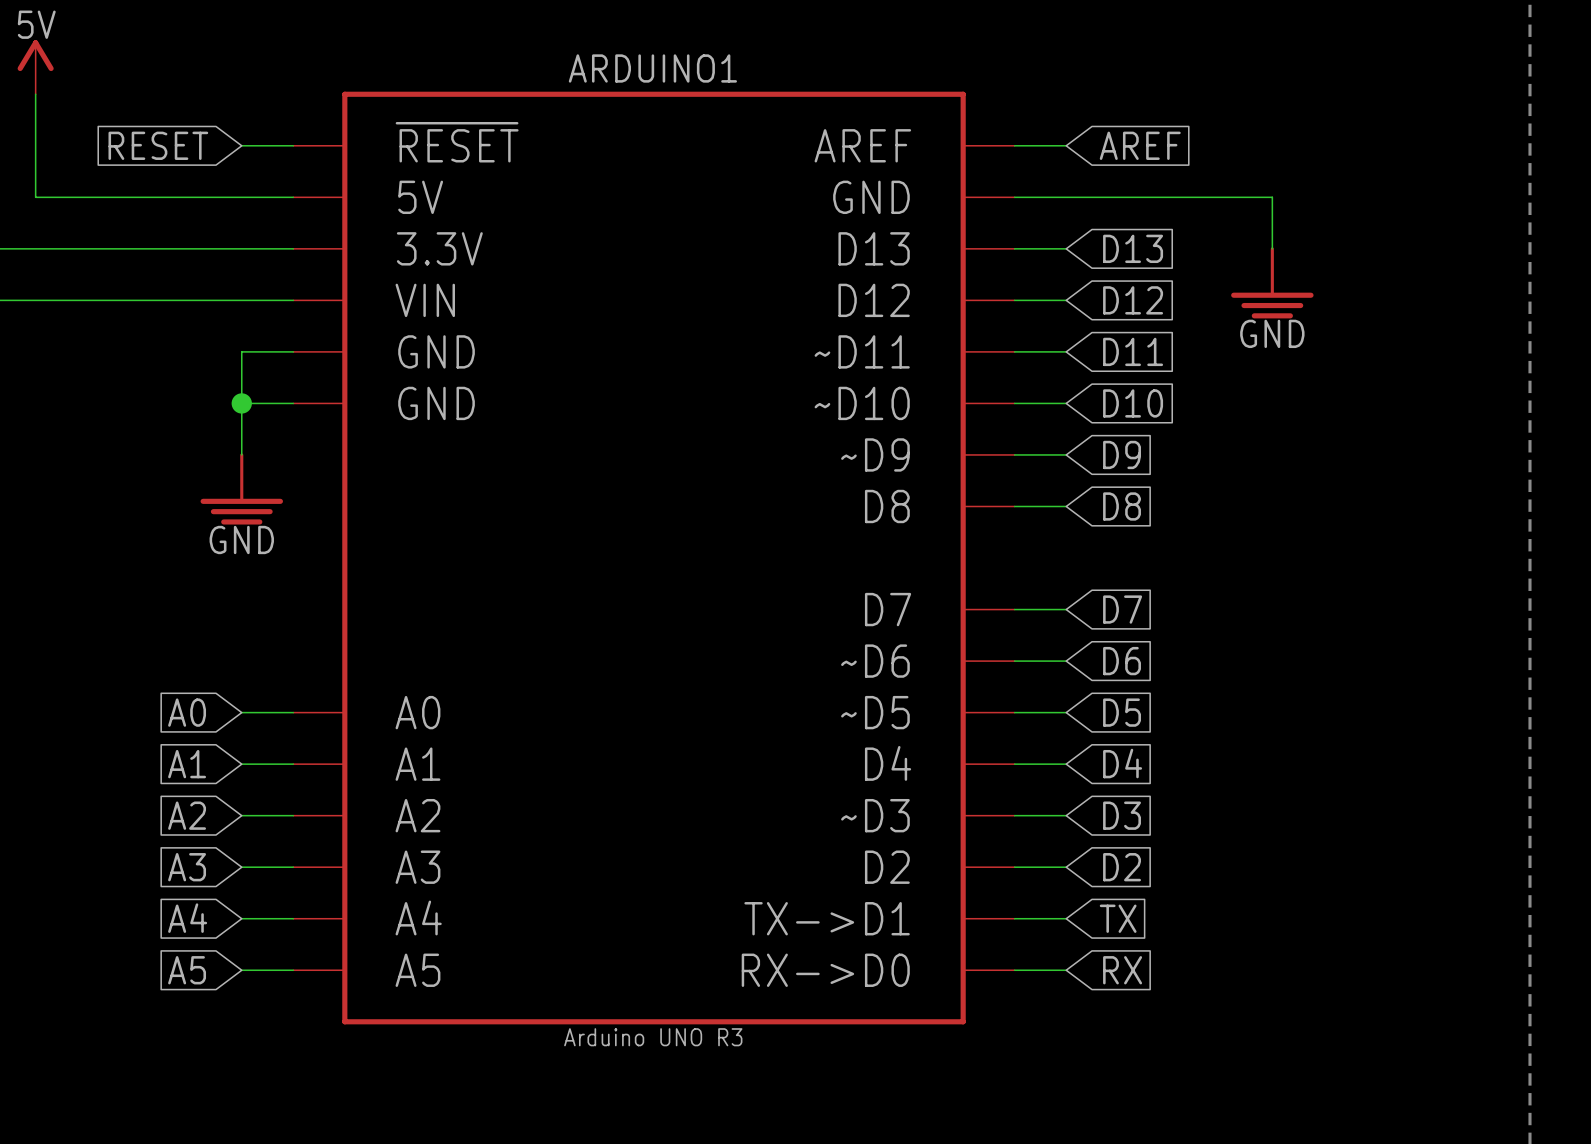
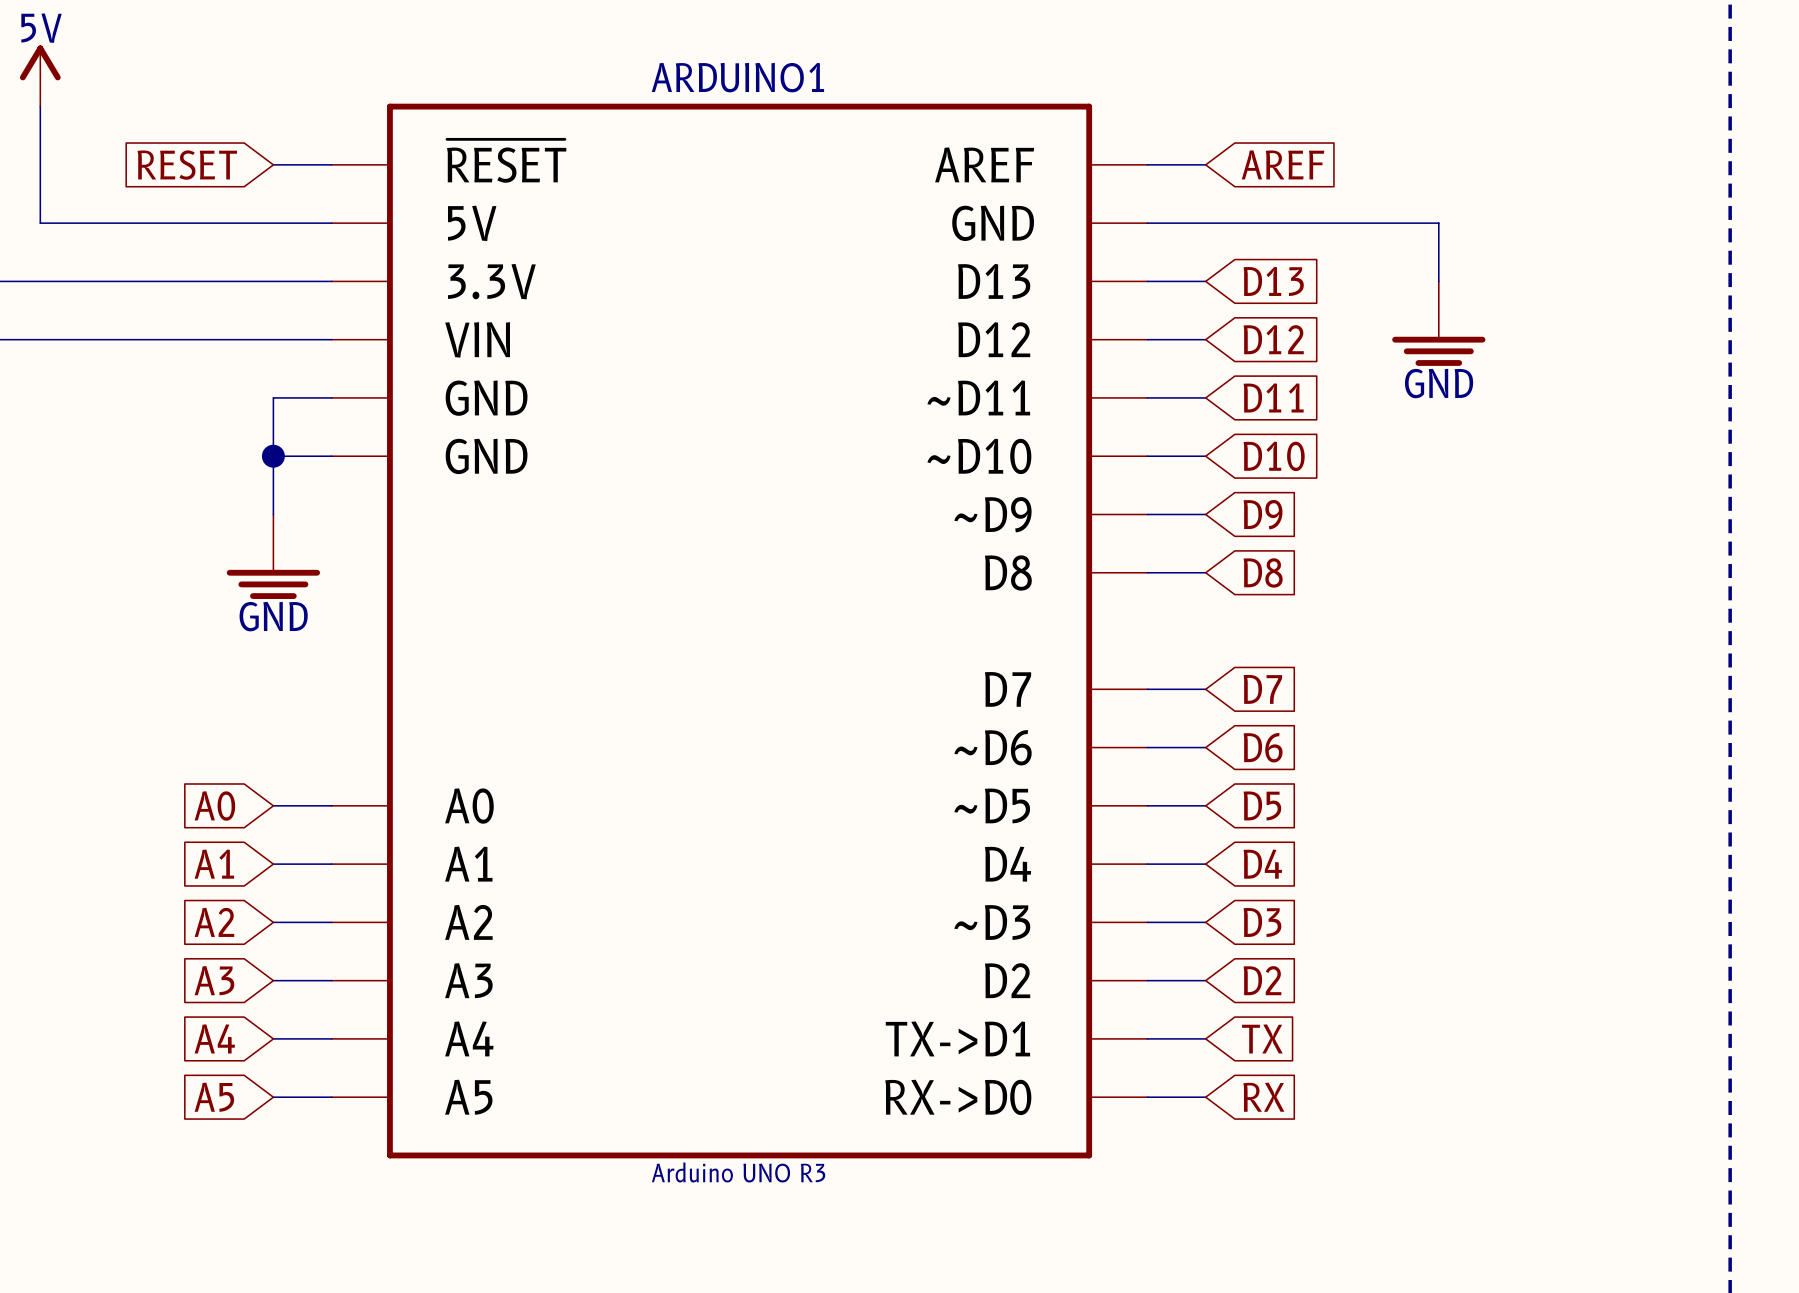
power symbol shape: [1231, 247, 1314, 319] -> [1392, 281, 1486, 366]
power symbol shape: [200, 453, 283, 525] -> [226, 514, 321, 599]

